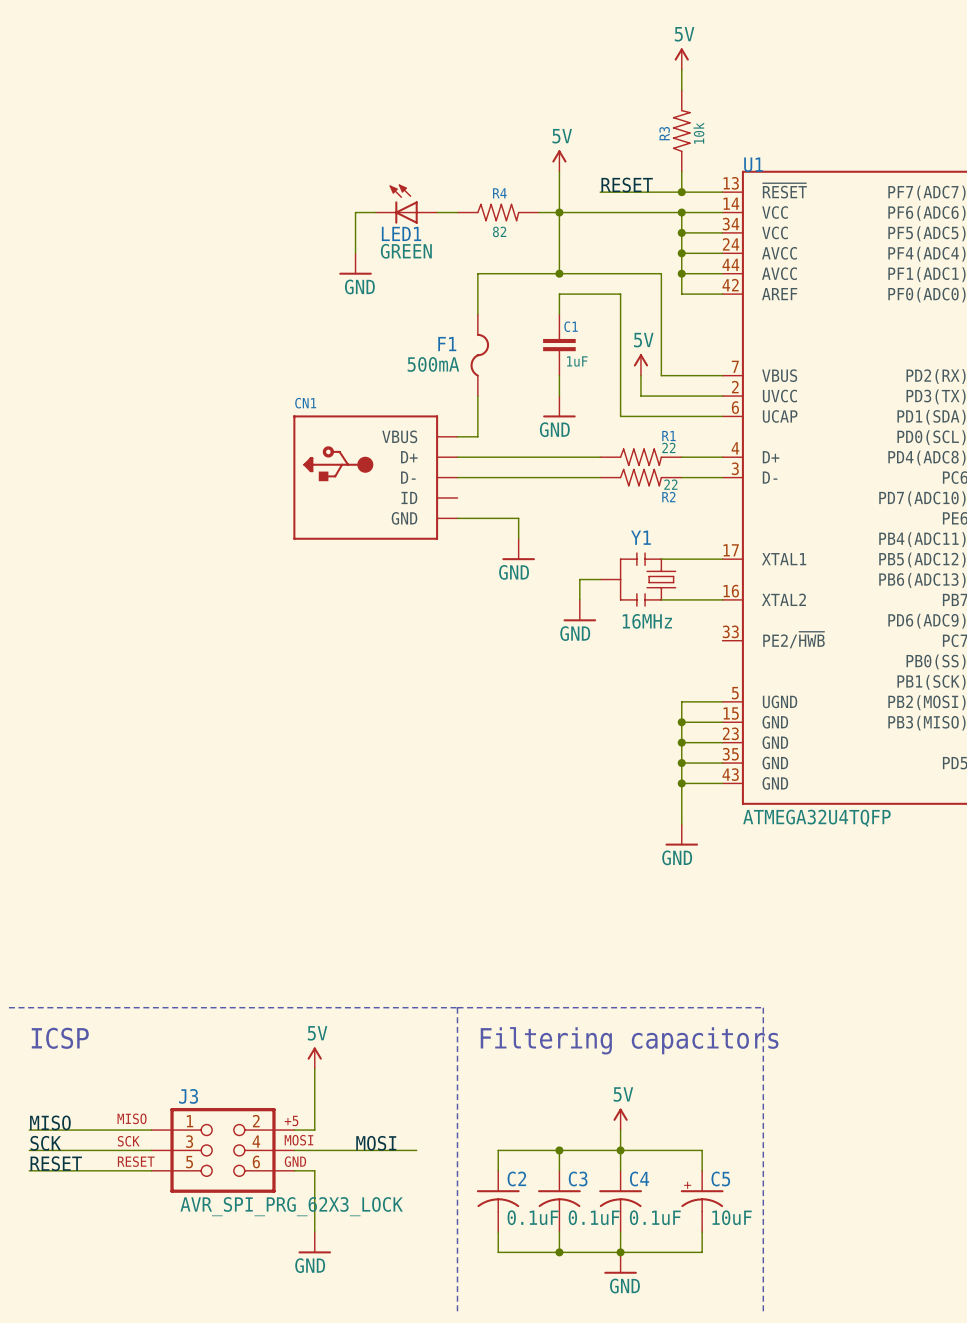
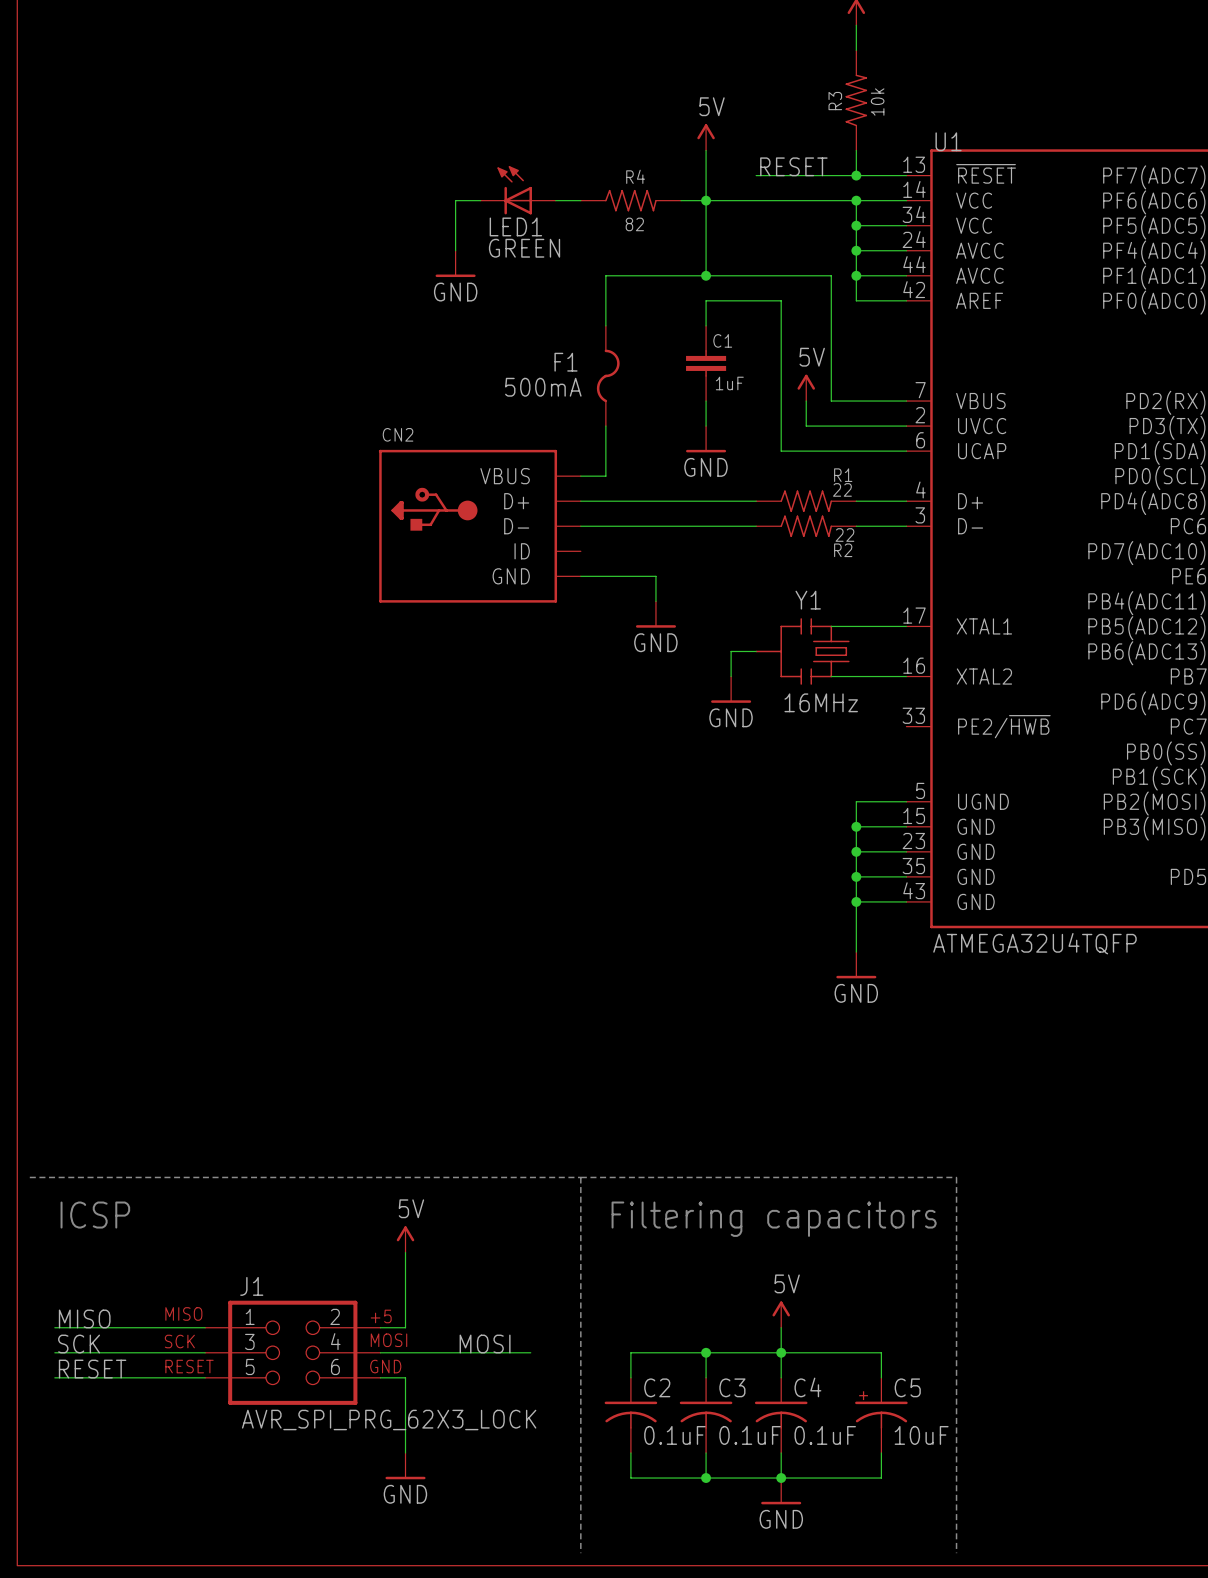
CN1 name: CN1 (305, 403) -> CN2 (398, 434)
J3 name: J3 (188, 1096) -> J1 (251, 1286)

